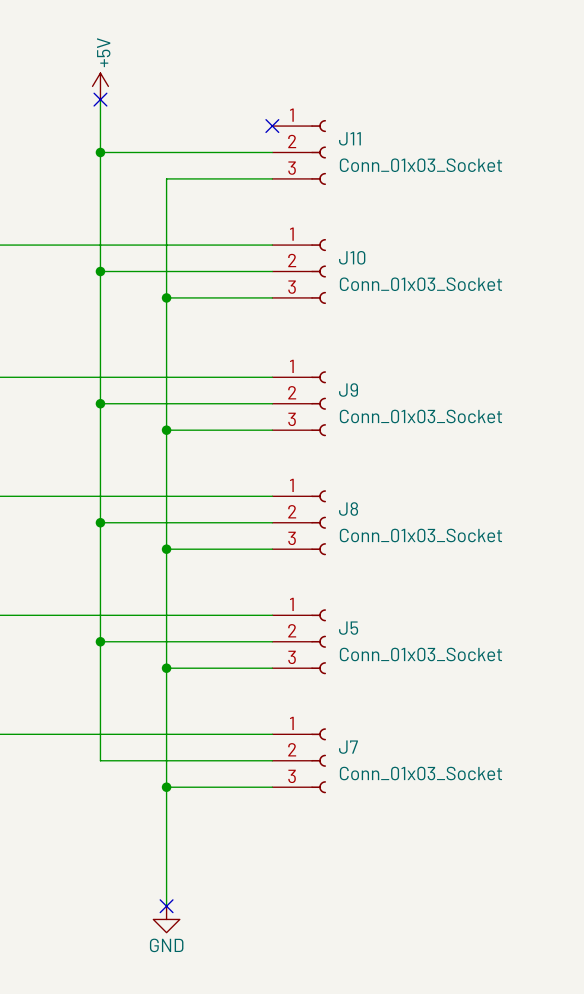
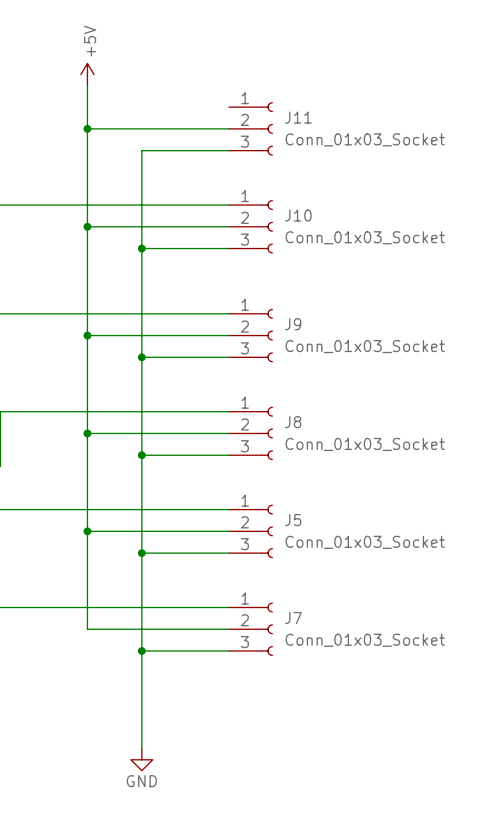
no-connect mark: (100, 99) -> none
no-connect mark: (272, 126) -> none
no-connect mark: (166, 906) -> none

